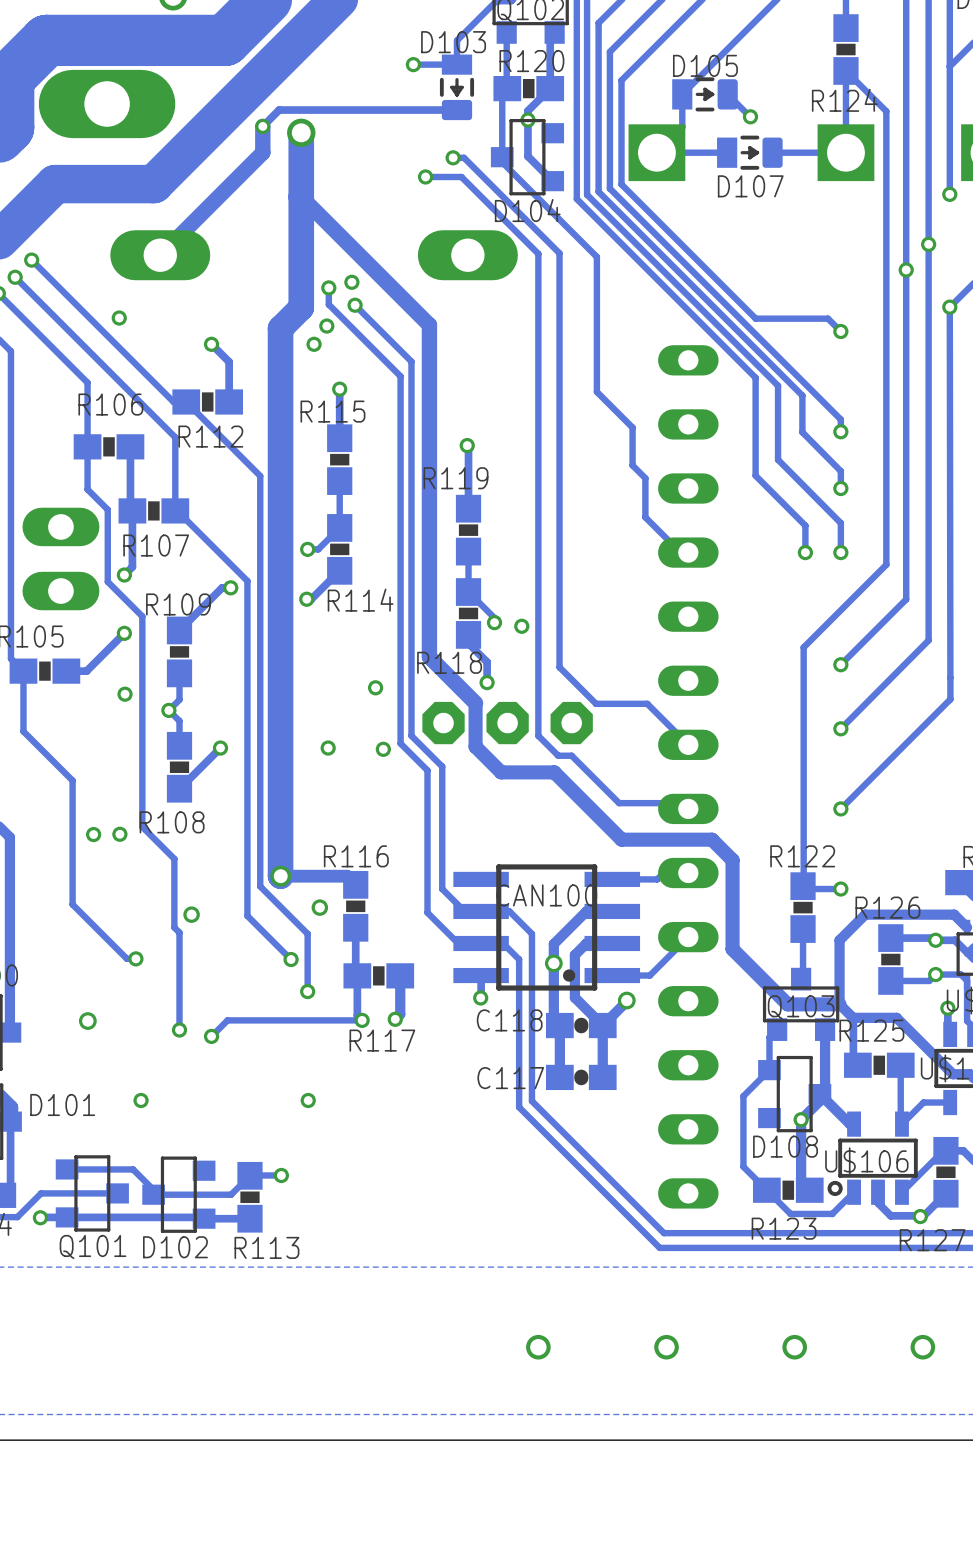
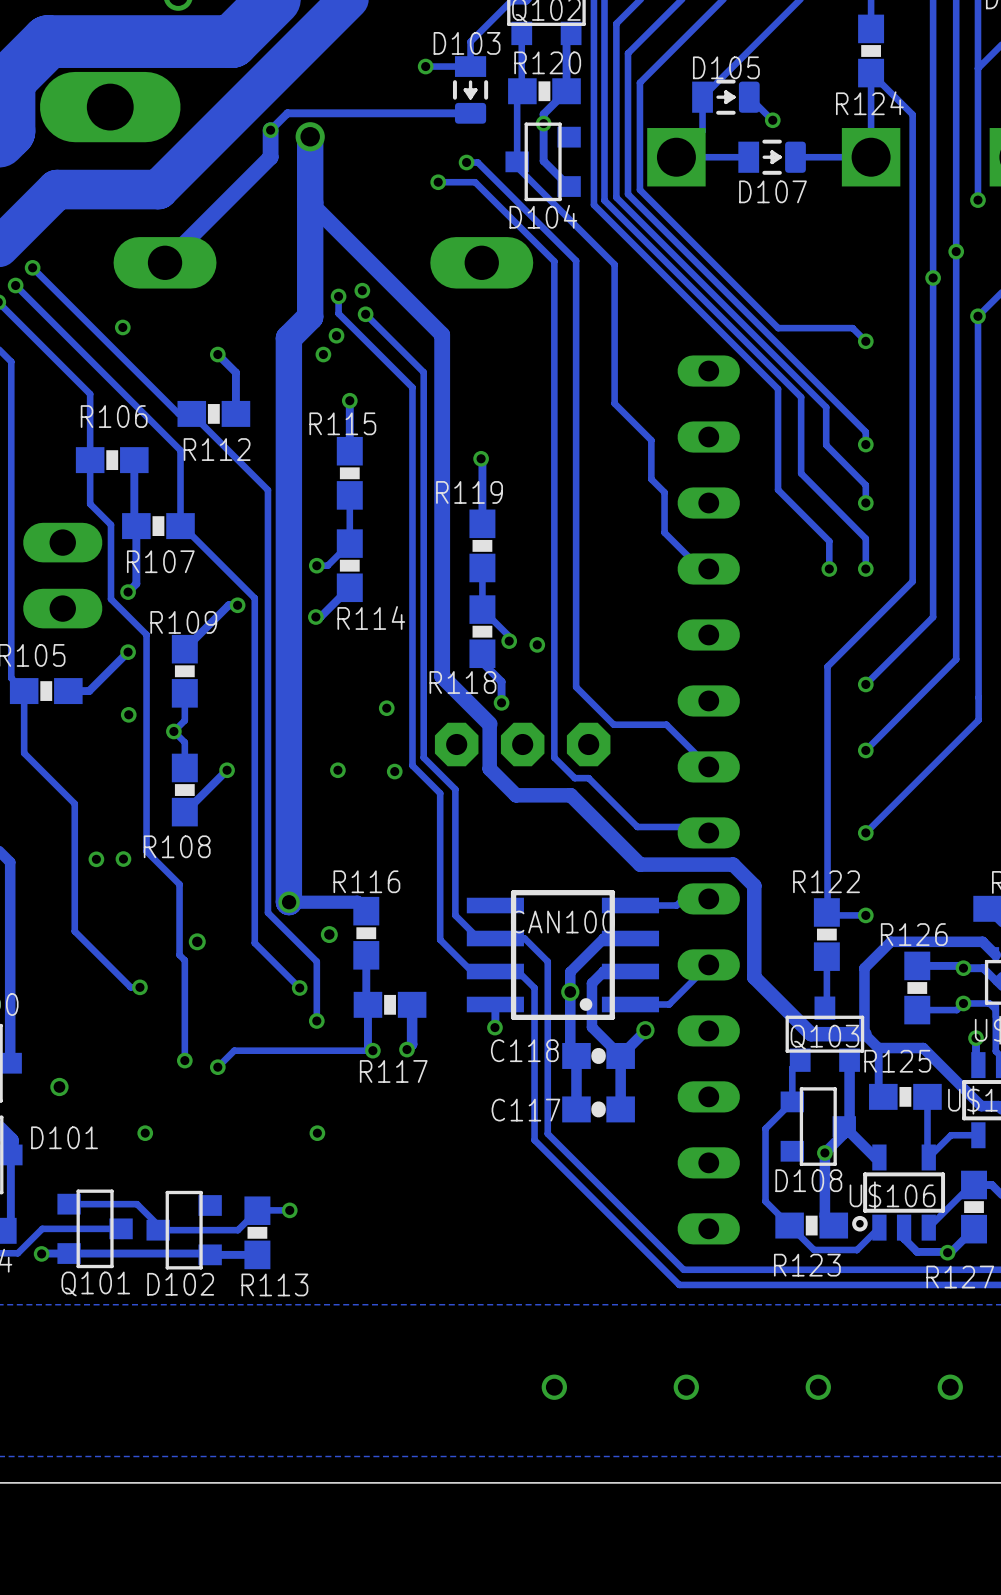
via position: (87, 1021) -> (59, 1086)

